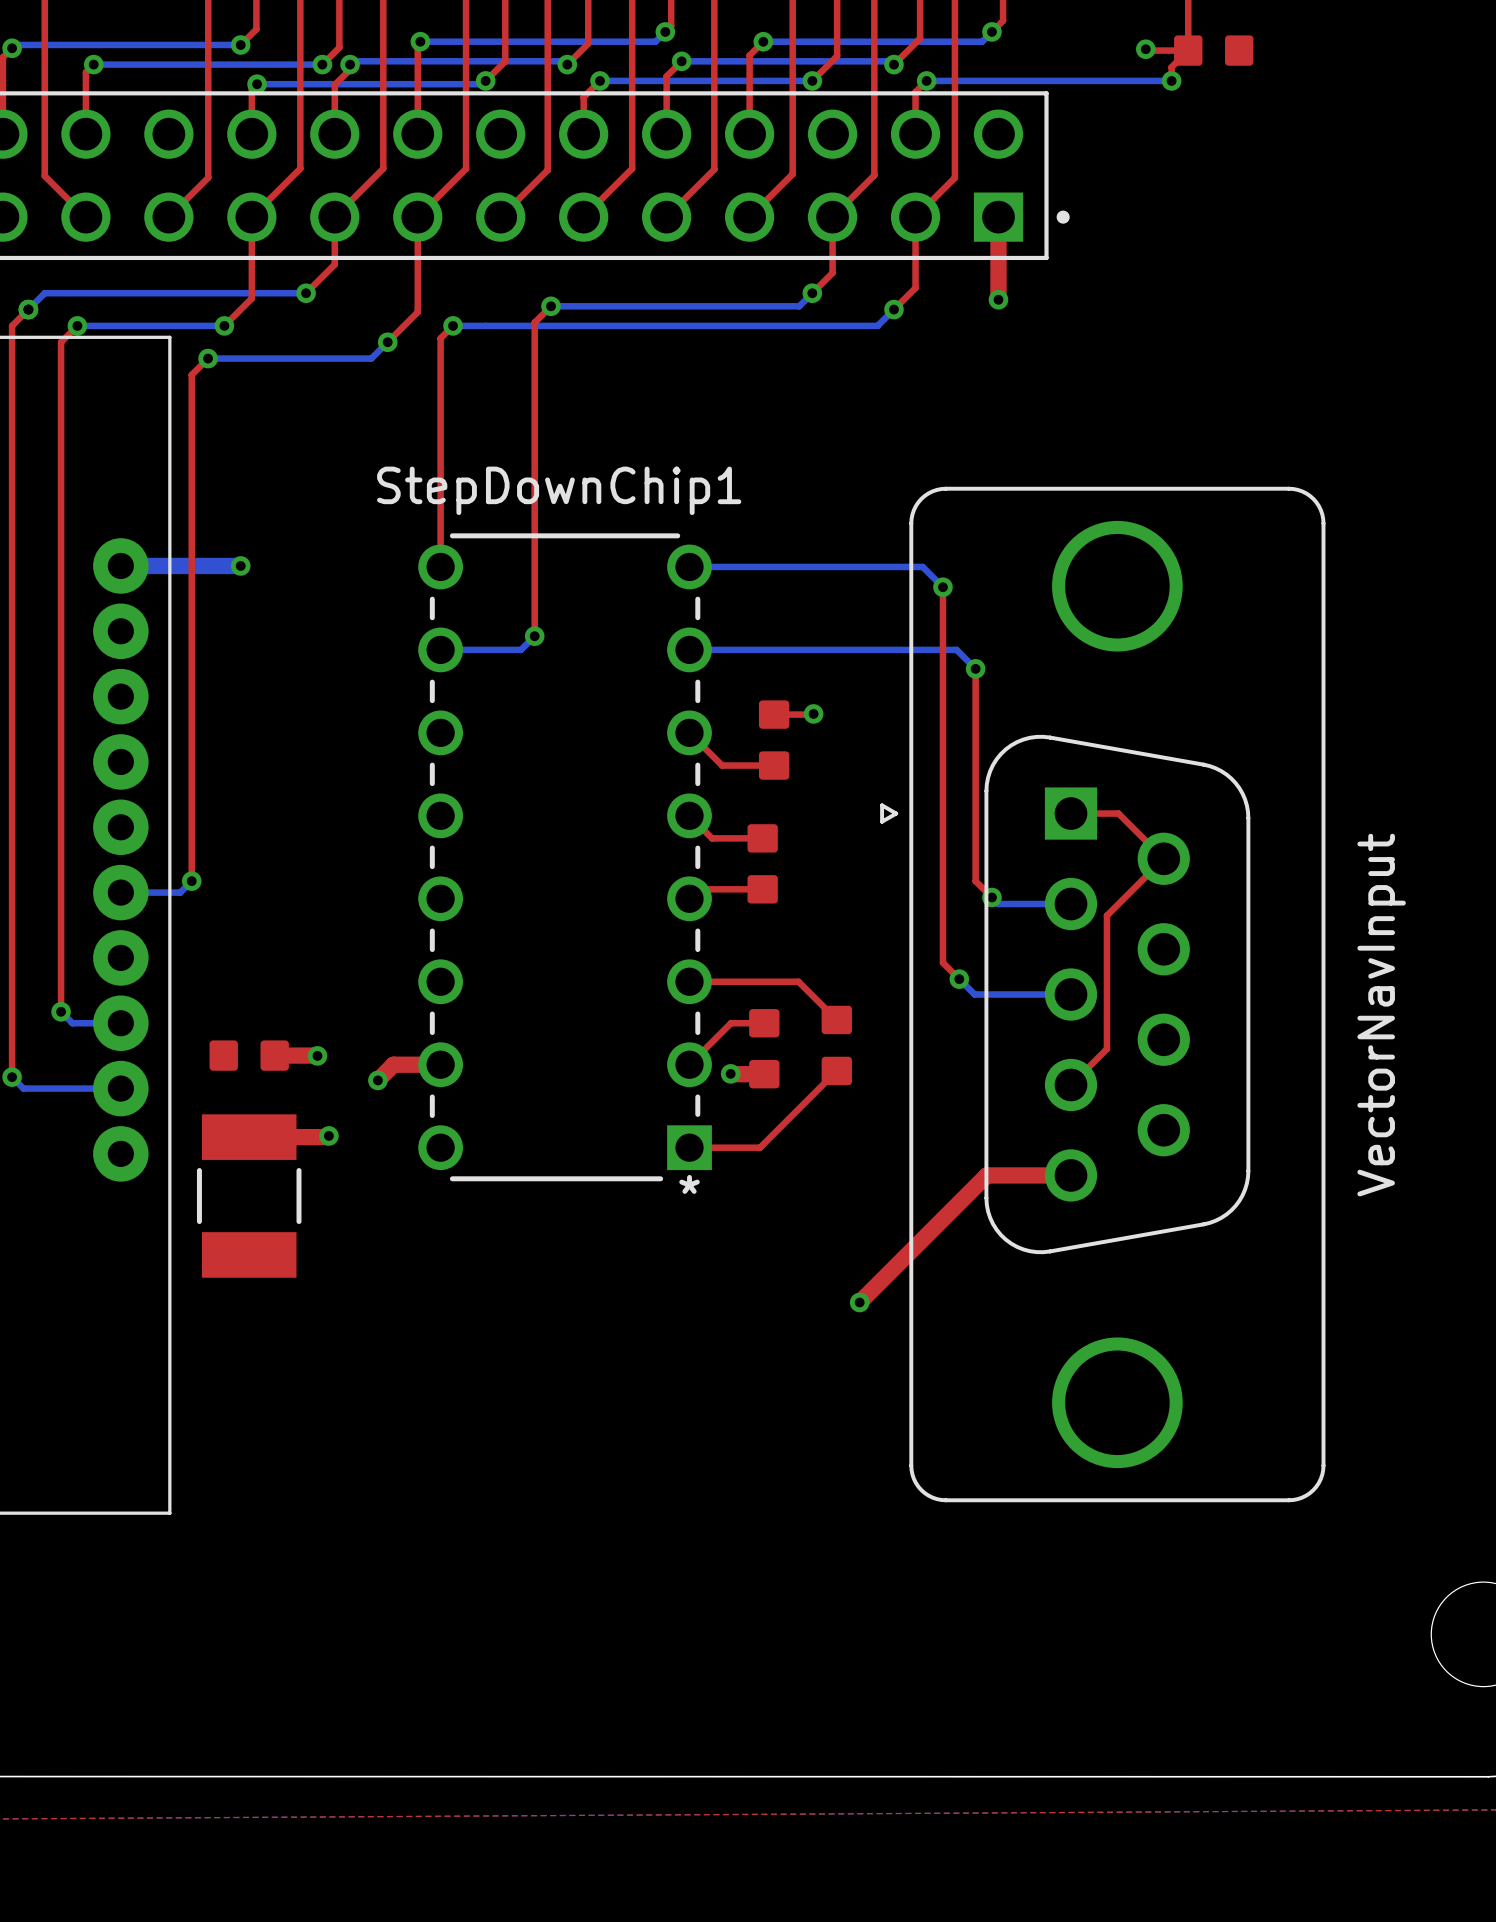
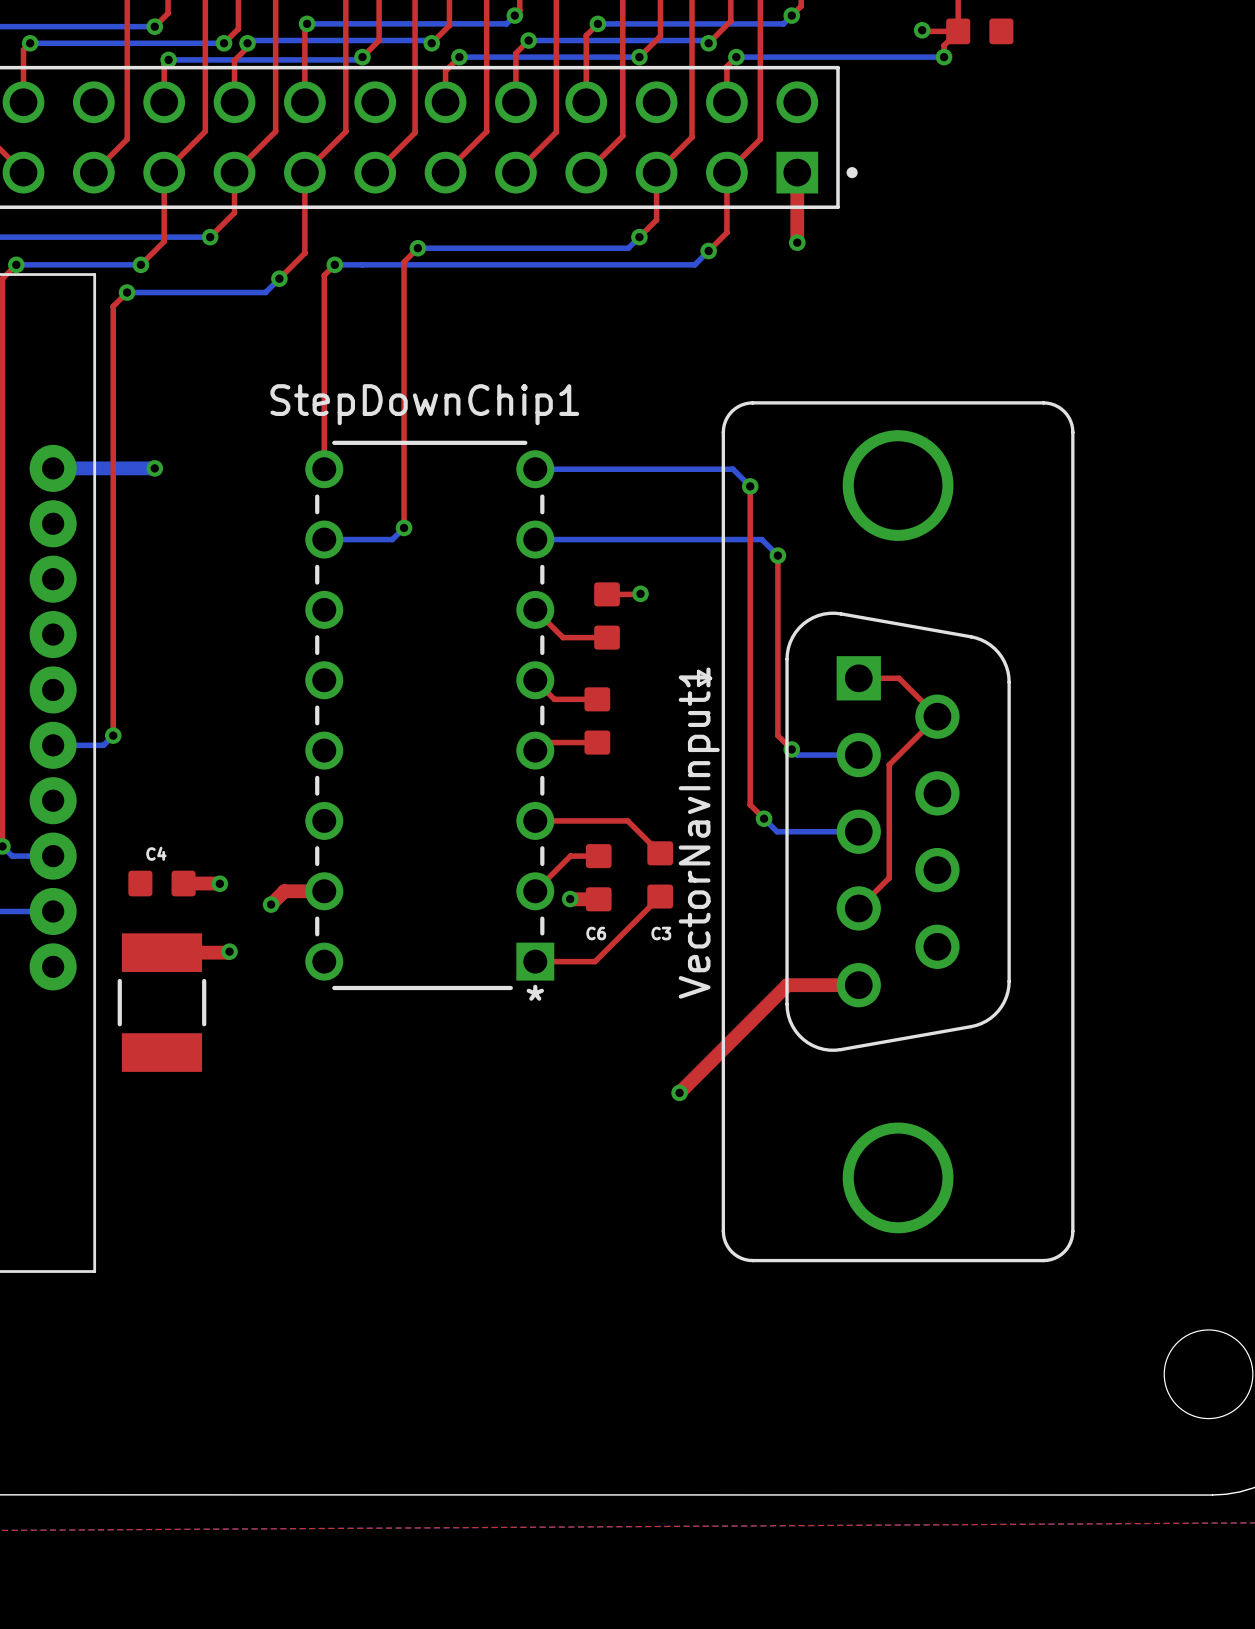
VectorNavInput name: VectorNavInput (1381, 1015) -> VectorNavInput1 (699, 833)
C4 name: none -> C4 (156, 853)
C6 name: none -> C6 (596, 933)
C3 name: none -> C3 (661, 933)

